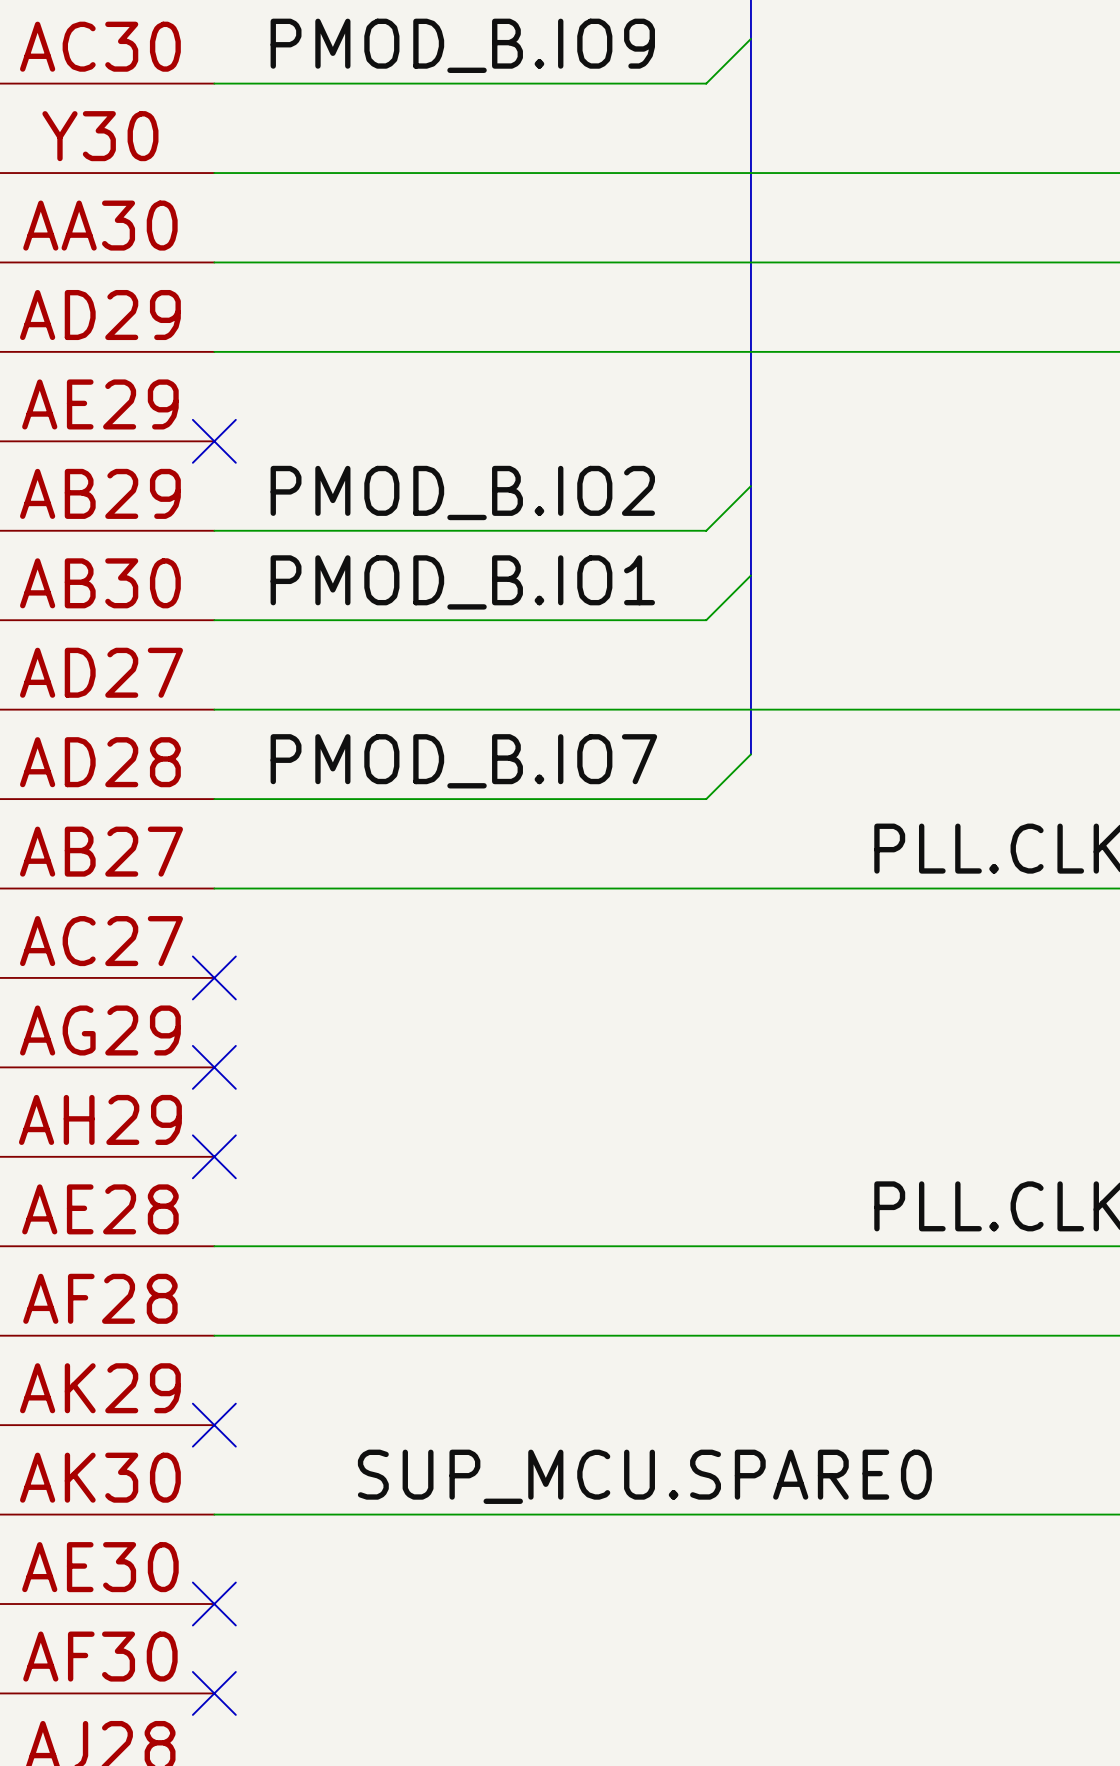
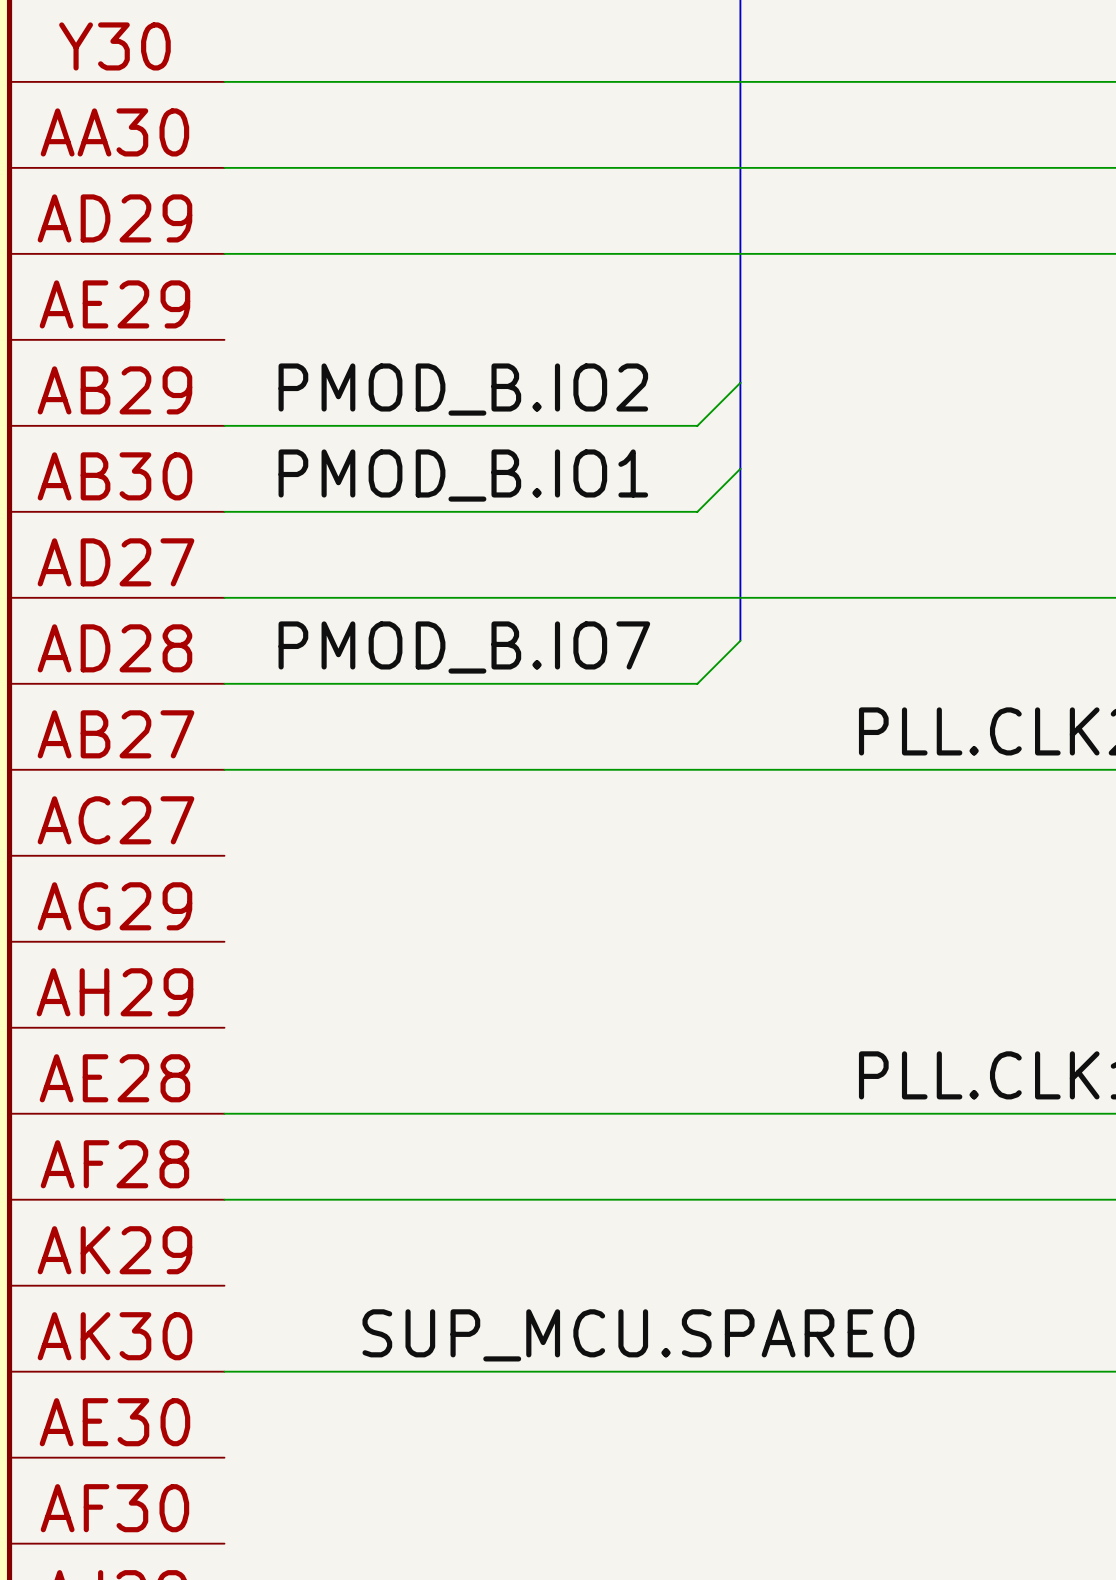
no-connect mark: (214, 441) -> none
no-connect mark: (214, 977) -> none
no-connect mark: (214, 1067) -> none
no-connect mark: (214, 1156) -> none
no-connect mark: (214, 1425) -> none
no-connect mark: (214, 1604) -> none
no-connect mark: (214, 1693) -> none

